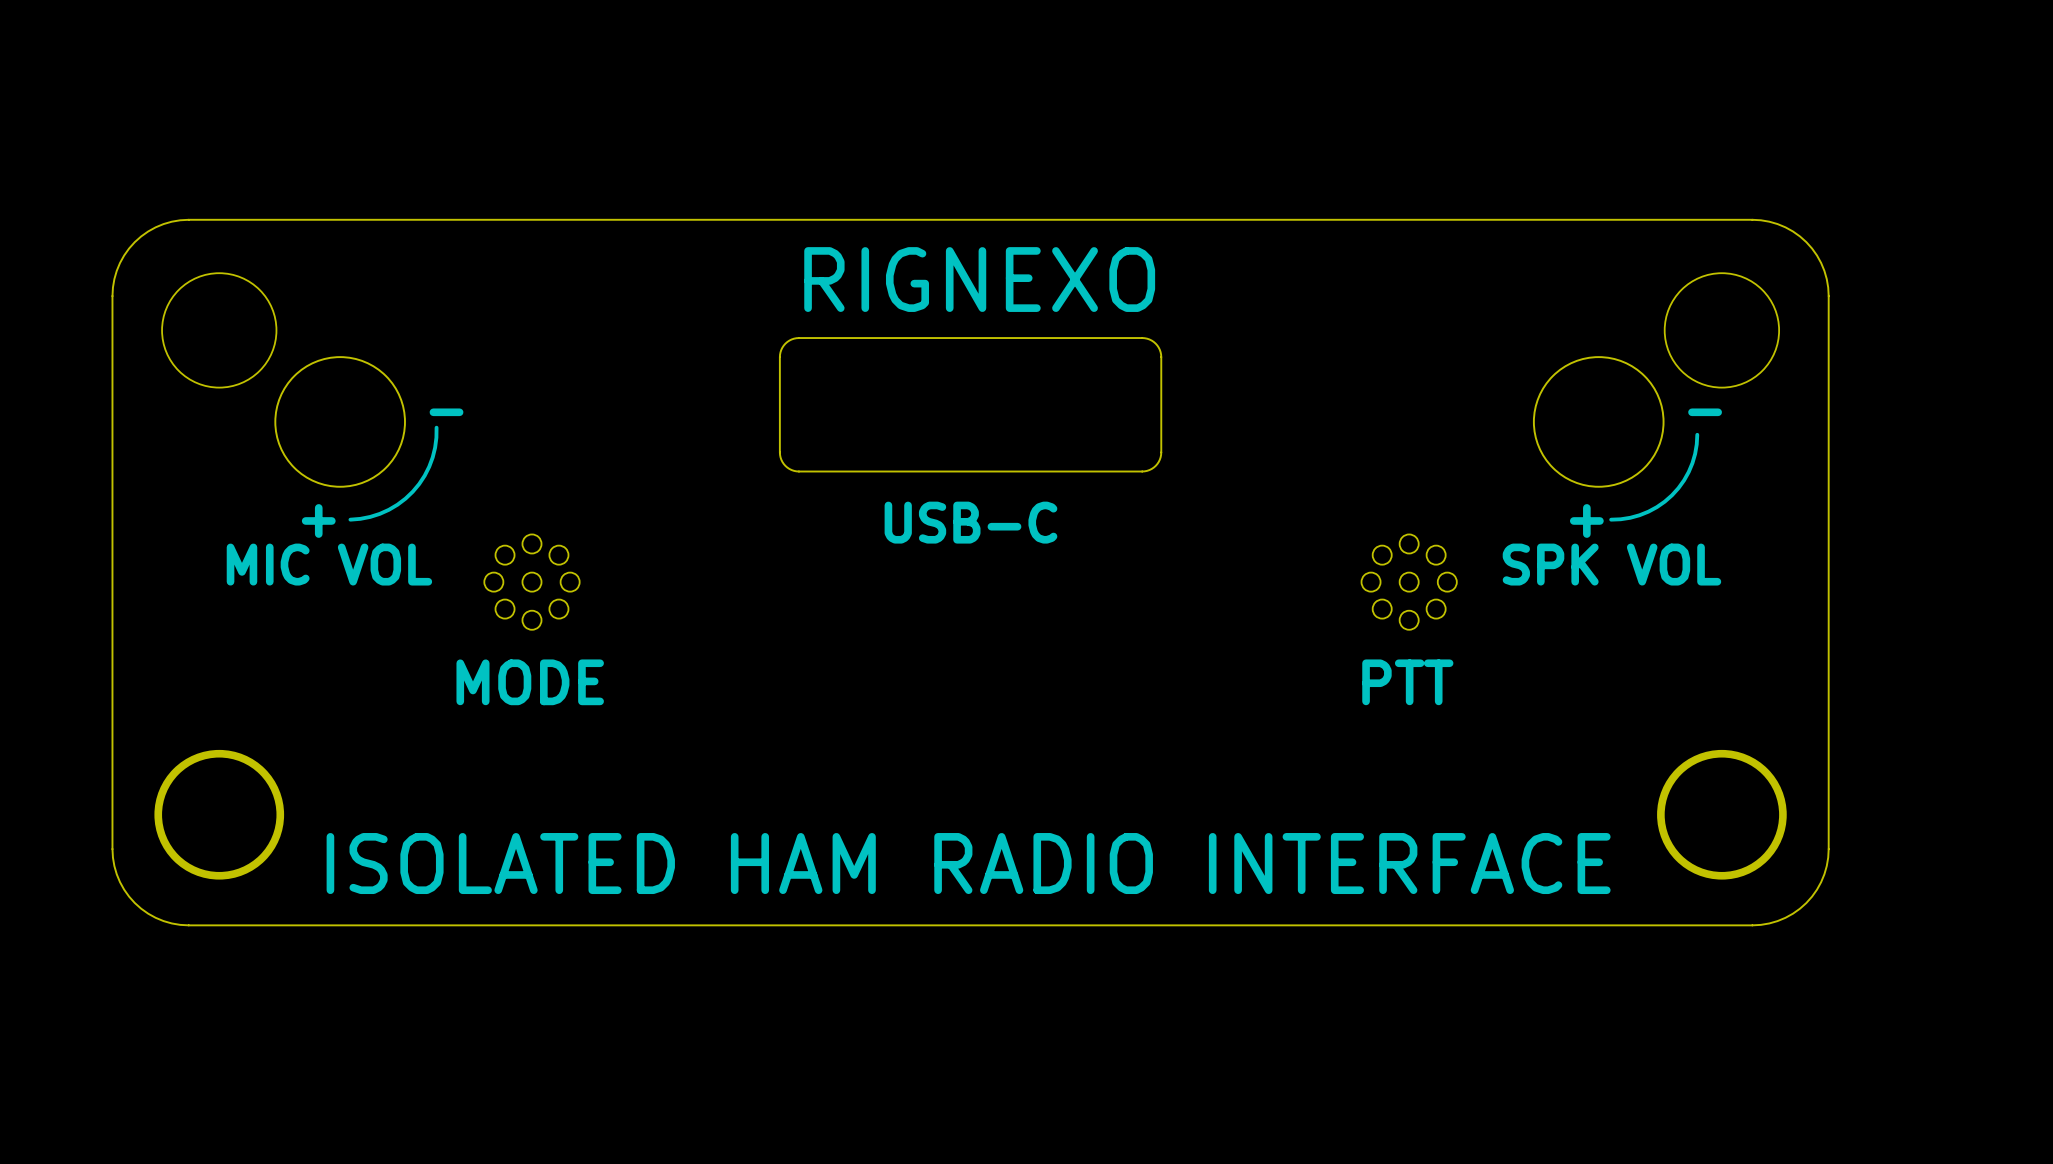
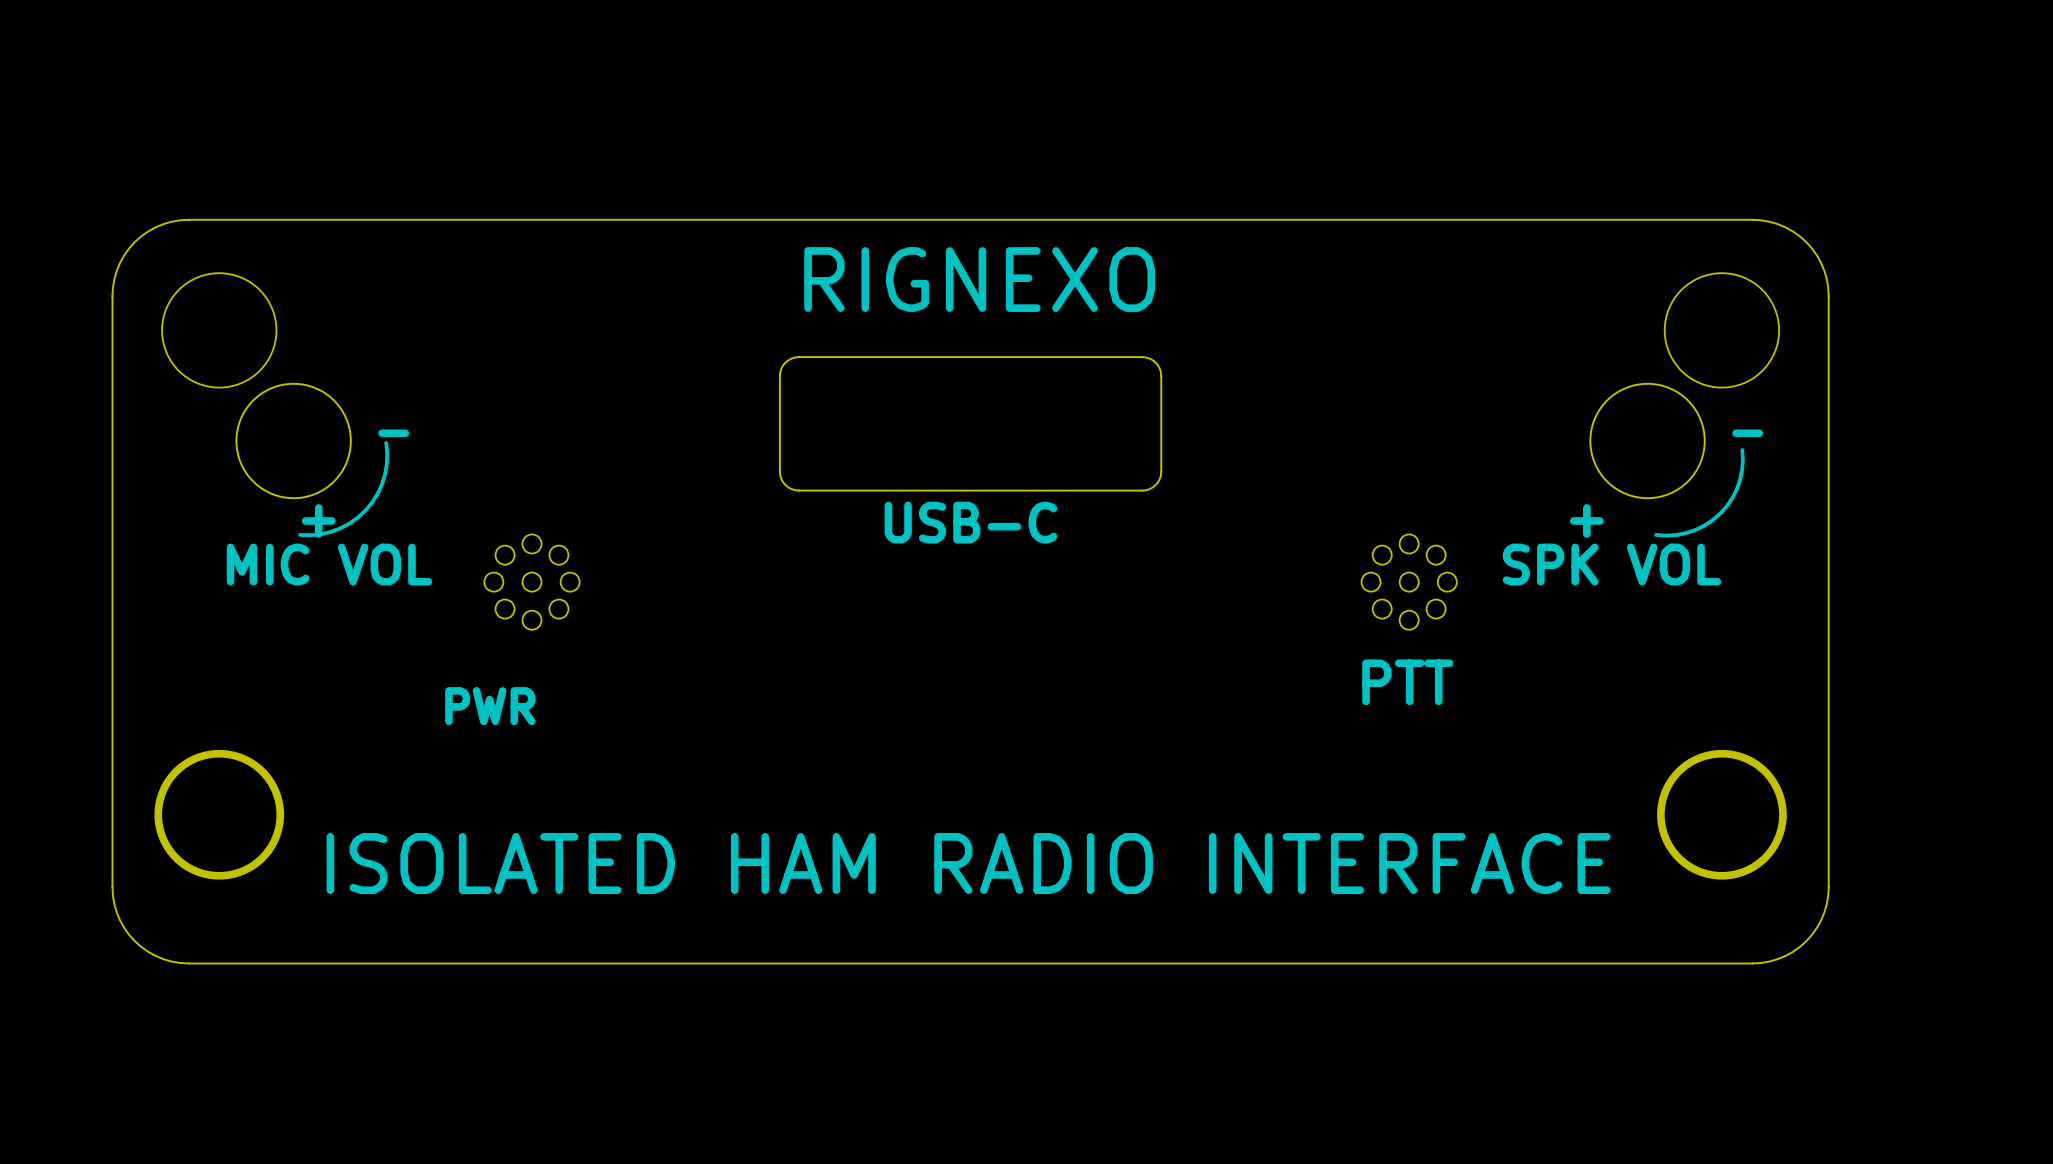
round board edge: [274, 356, 406, 488] -> none
round board edge: [1532, 356, 1665, 488] -> none
board edge: (779, 376) (780, 354) (782, 347) (789, 340) (798, 338) (1144, 338) (1153, 341) (1159, 349) (1161, 376) -> (779, 376) (785, 362) (798, 357) (1142, 357) (1155, 362) (1161, 376)
round board edge: none -> [235, 382, 352, 500]
round board edge: none -> [1589, 382, 1706, 500]
text position: - (446, 412) -> - (393, 433)
text position: - (1705, 412) -> - (1747, 433)
line: (436, 427) (432, 457) (424, 475) (412, 491) (397, 504) (379, 513) (350, 519) -> none
line: (1697, 434) (1695, 453) (1688, 471) (1672, 495) (1656, 507) (1639, 515) (1611, 519) -> none
line: none -> (386, 442) (385, 473) (377, 493) (365, 510) (349, 523) (330, 531) (300, 534)
line: none -> (1742, 450) (1740, 479) (1732, 498) (1720, 513) (1695, 530) (1676, 535) (1656, 534)
board edge: (779, 452) (785, 465) (798, 471) (1142, 471) (1155, 465) (1161, 452) -> (779, 452) (780, 474) (782, 481) (789, 488) (798, 490) (1144, 490) (1153, 486) (1159, 478) (1161, 452)
text: MODE (530, 682) -> PWR (490, 706)
board edge: (112, 849) (114, 866) (120, 882) (134, 903) (148, 913) (163, 921) (188, 925) (1752, 925) (1777, 921) (1792, 913) (1806, 903) (1821, 882) (1826, 866) (1828, 849) -> (112, 849) (112, 895) (116, 912) (124, 927) (134, 941) (155, 955) (171, 961) (188, 963) (1760, 963) (1777, 959) (1792, 951) (1806, 941) (1817, 927) (1824, 912) (1828, 895) (1828, 849)

